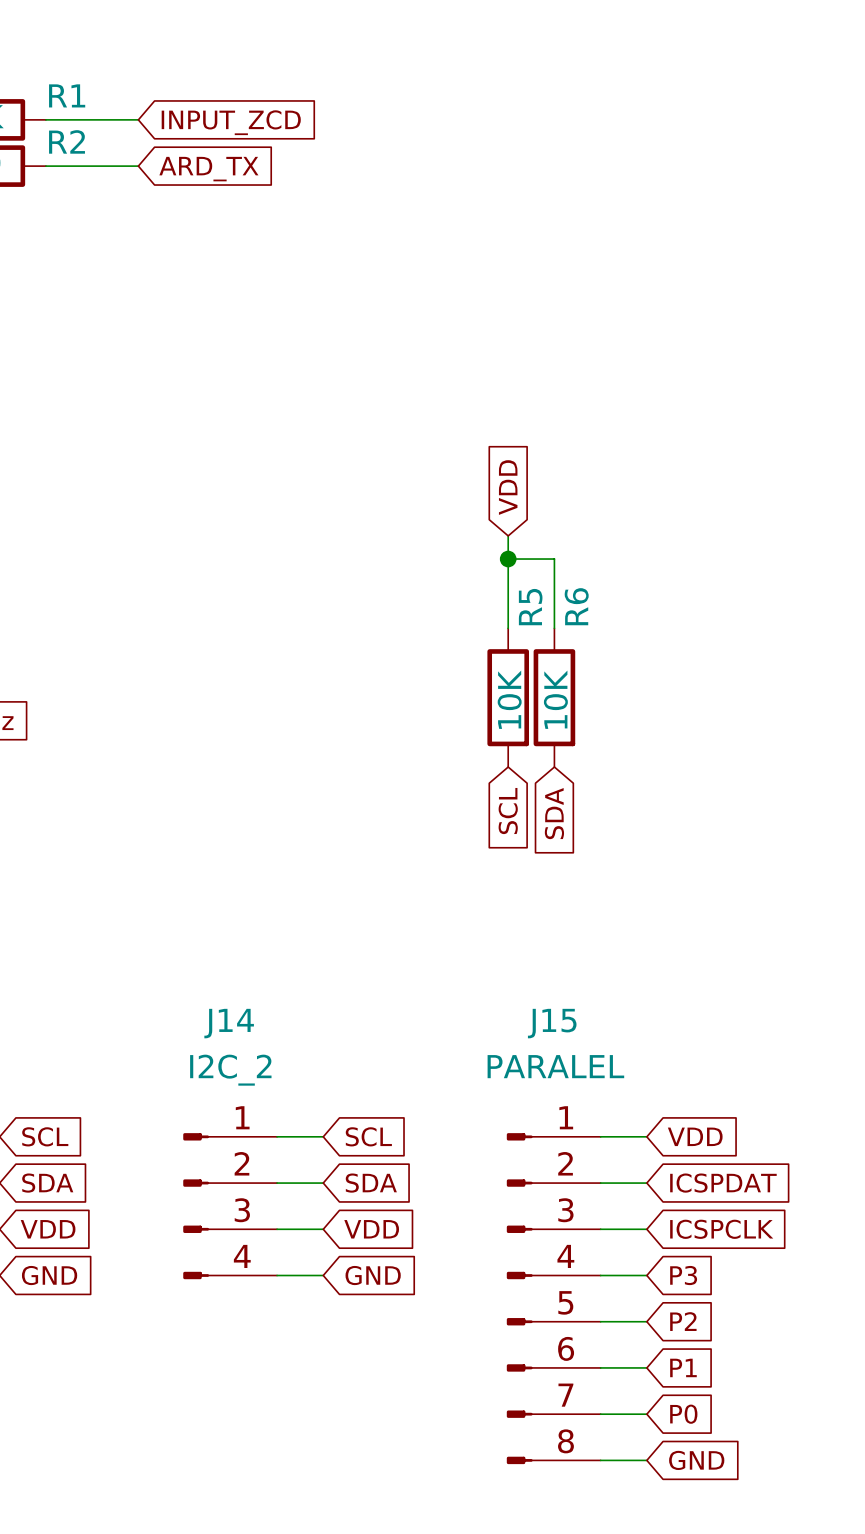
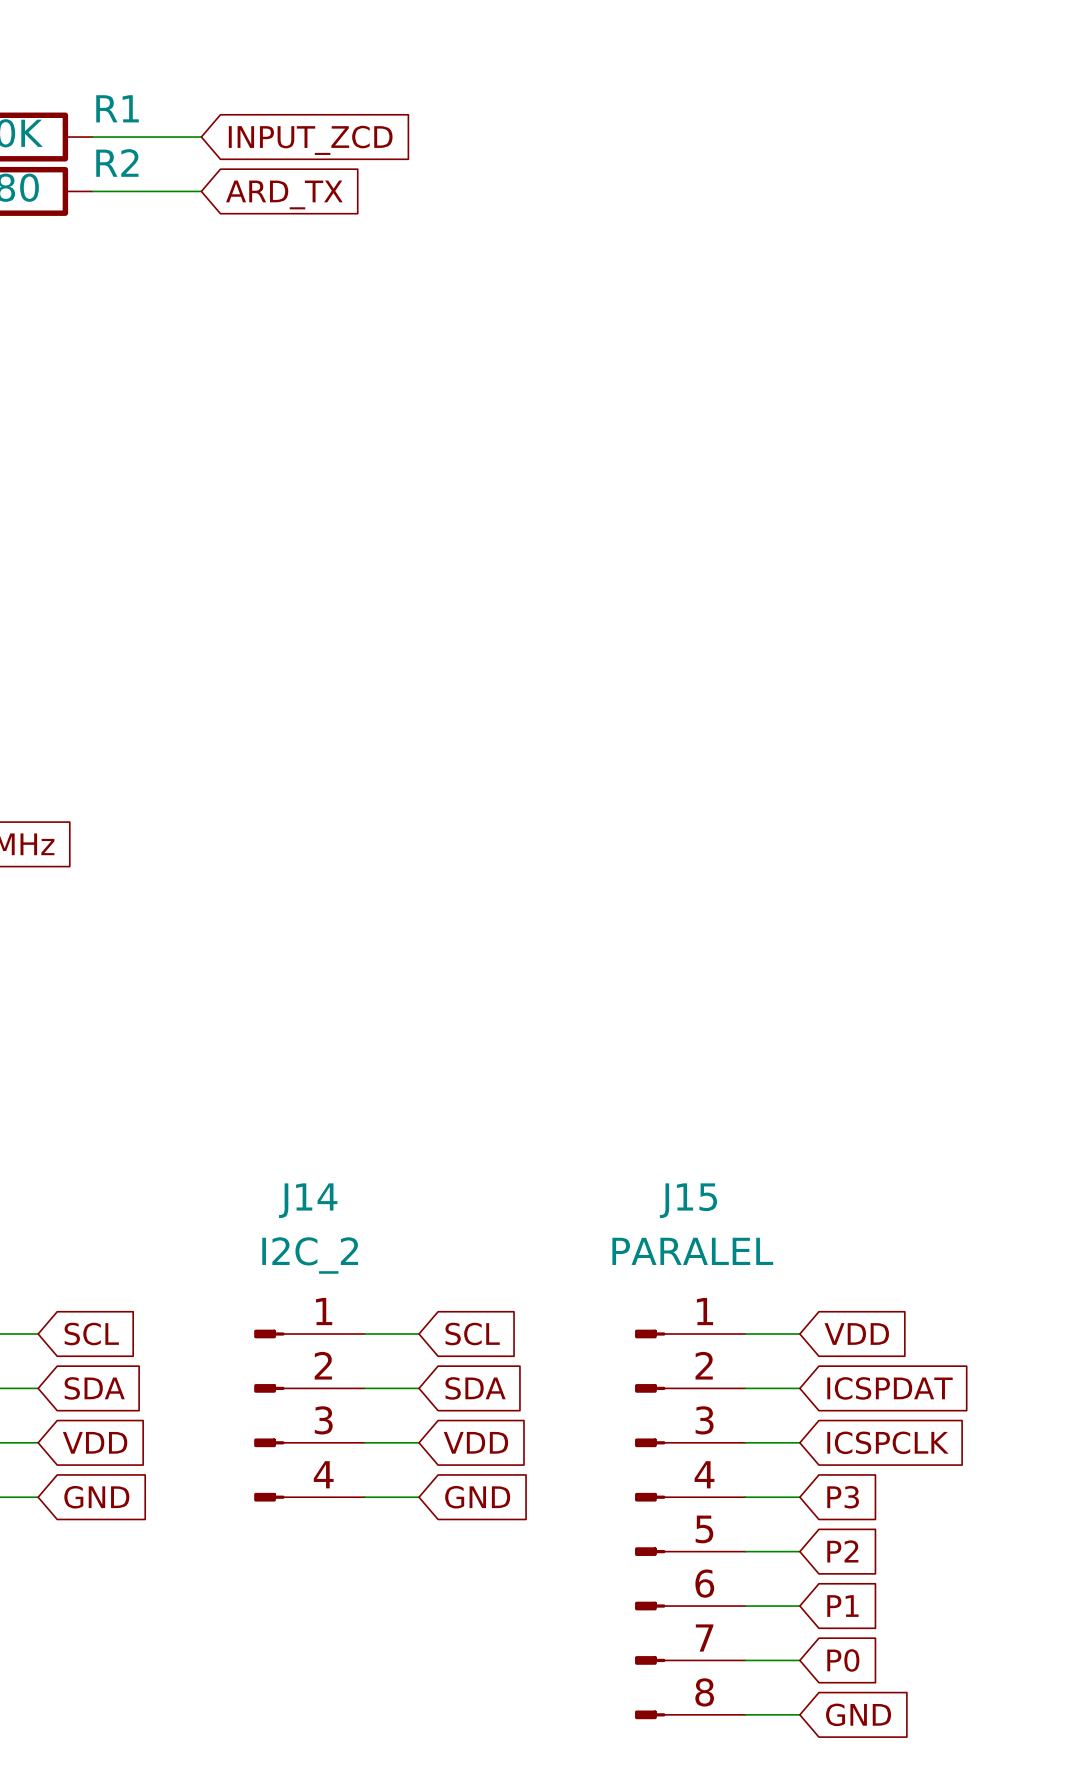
global label: VDD (508, 487) -> none
wire: (508, 535) (508, 628) -> none
wire: (508, 559) (554, 559) (554, 628) -> none
junction: (508, 559) -> none
R5: 10K (508, 697) -> none
R6: 10K (554, 697) -> none
global label: SCL (508, 811) -> none
global label: SDA (554, 813) -> none

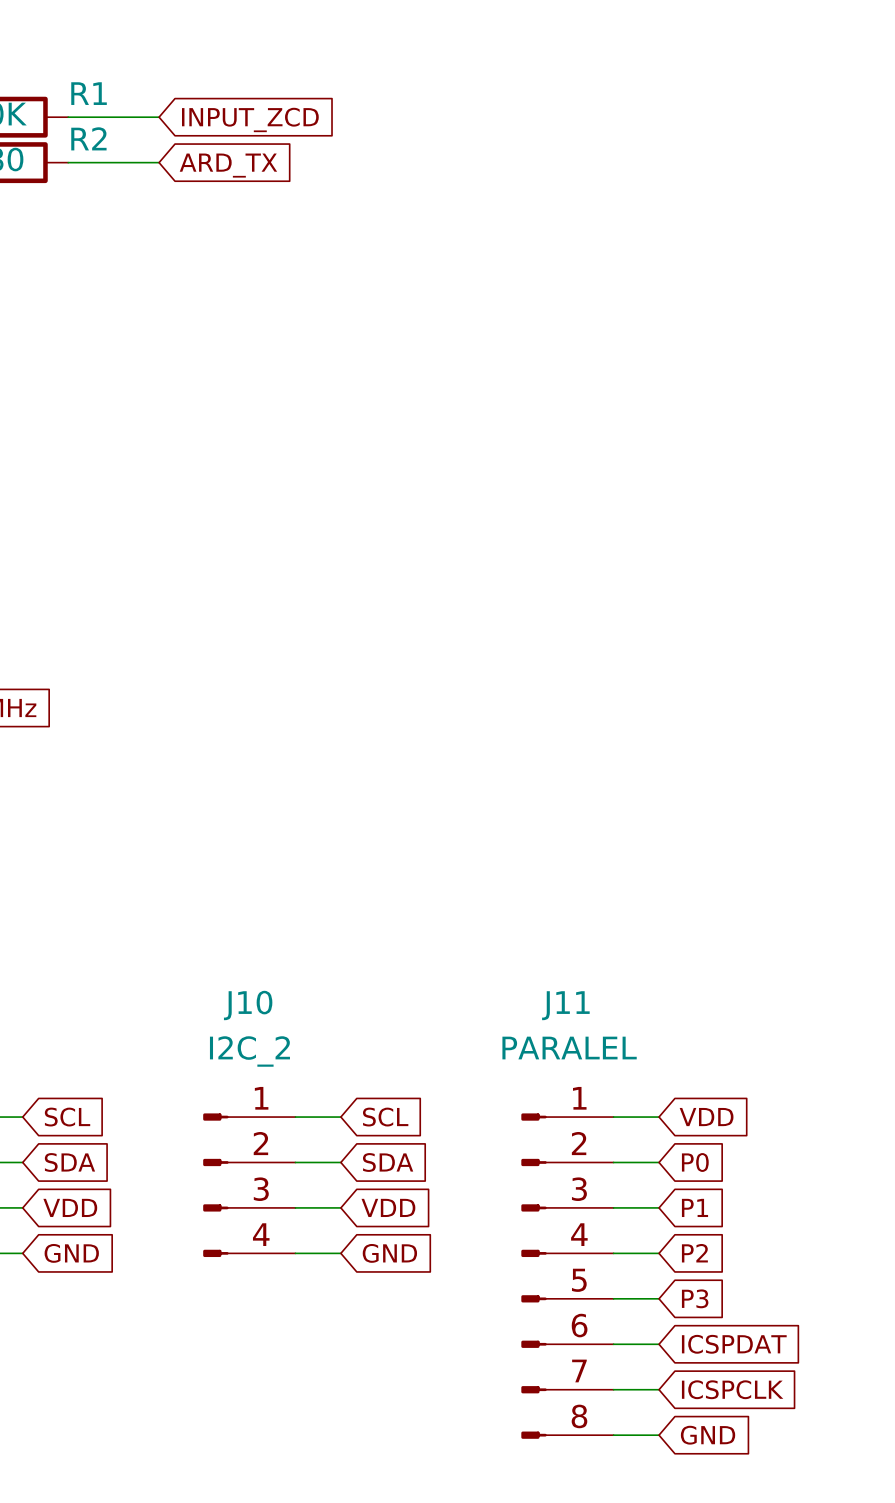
J14 name: J14 (308, 1200) -> J10 (248, 1005)
J15 name: J15 (688, 1200) -> J11 (565, 1005)
global label: ICSPDAT (889, 1388) -> P0 (695, 1162)
global label: ICSPCLK (887, 1442) -> P1 (695, 1207)
global label: P3 (843, 1497) -> P2 (694, 1253)
global label: P2 (842, 1551) -> P3 (695, 1298)
global label: P1 (842, 1606) -> ICSPDAT (734, 1344)
global label: P0 (843, 1660) -> ICSPCLK (732, 1389)

